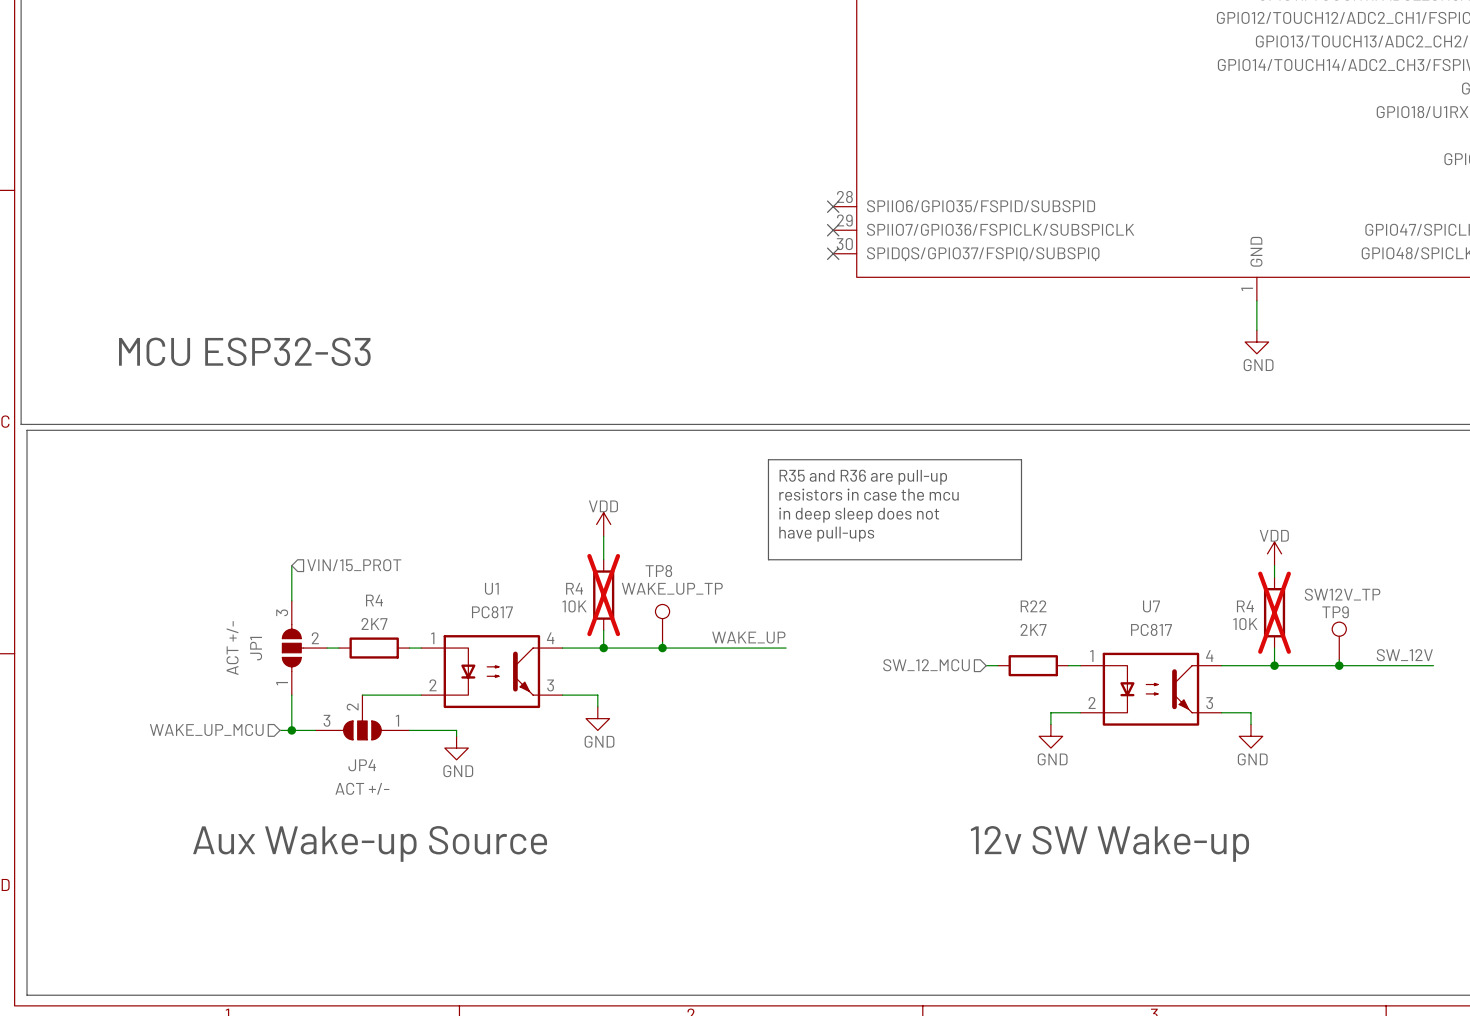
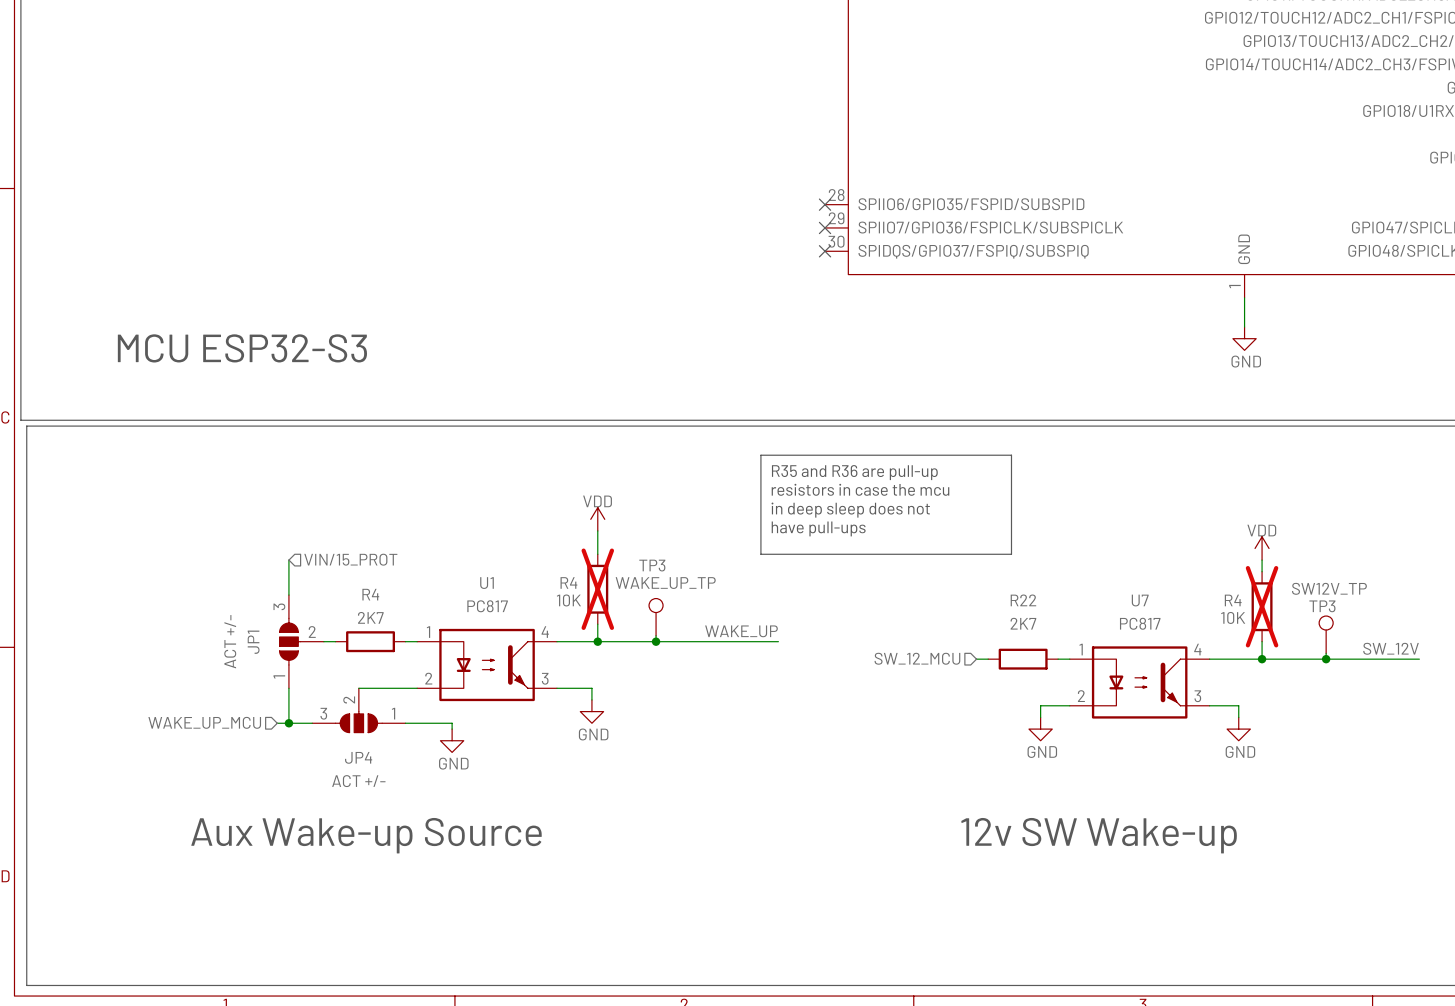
TP8 name: TP8 (658, 571) -> TP3 (652, 565)
TP9 name: TP9 (1335, 612) -> TP3 (1322, 606)

